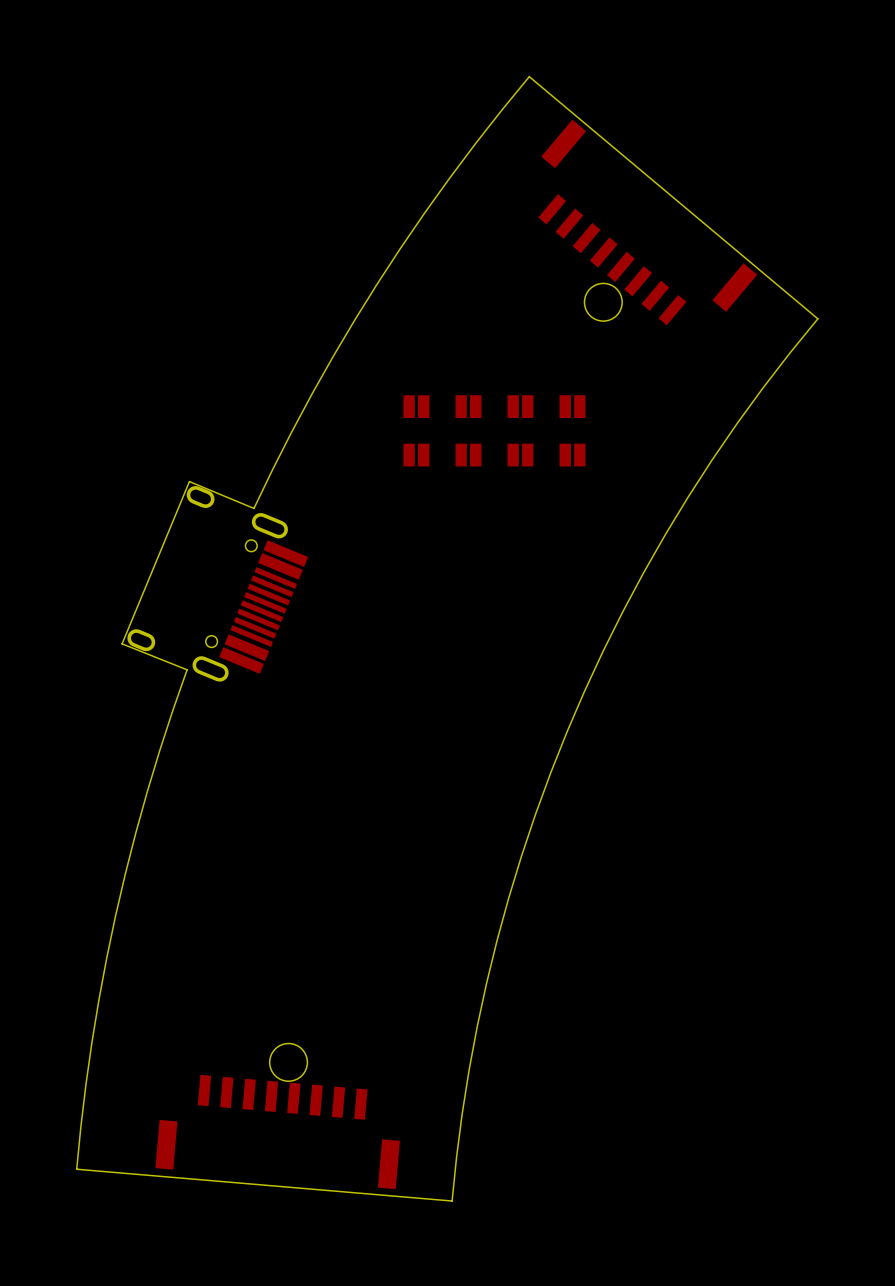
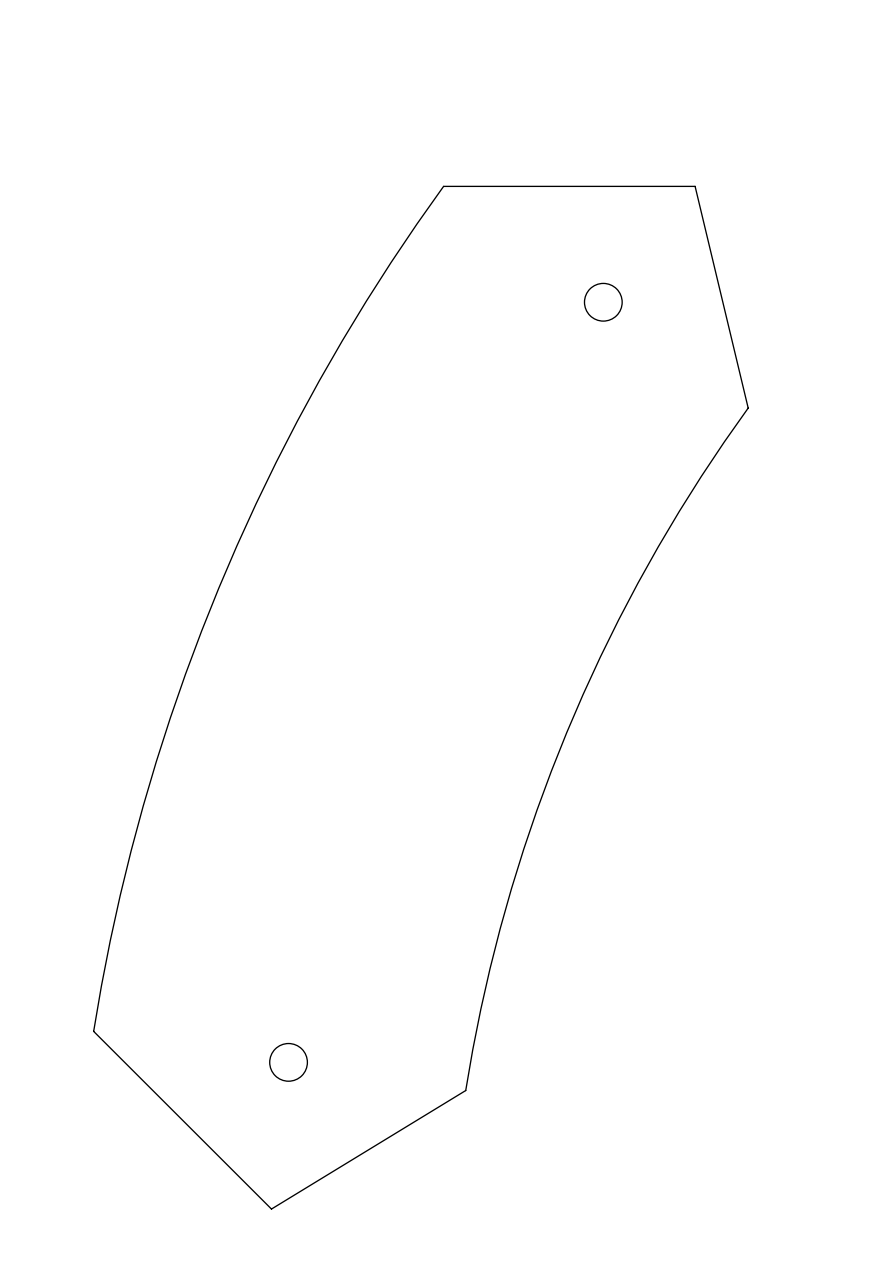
board edge: (529, 76) (817, 318) (737, 423) (665, 534) (603, 651) (567, 731) (535, 814) (497, 940) (469, 1069) (452, 1201) (76, 1169) (92, 1041) (115, 915) (147, 791) (187, 669) (122, 643) (189, 481) (253, 508) (312, 393) (377, 283) (450, 177) (529, 76) -> (695, 186) (748, 408) (701, 476) (658, 547) (618, 619) (566, 732) (523, 849) (500, 928) (480, 1009) (465, 1090) (271, 1209) (93, 1031) (110, 940) (143, 806) (170, 717) (218, 588) (276, 462) (319, 380) (366, 301) (443, 186) (695, 186)
part: (647, 222) -> none
part: (416, 406) -> none
part: (468, 406) -> none
part: (520, 406) -> none
part: (572, 406) -> none
part: (416, 455) -> none
part: (468, 455) -> none
part: (520, 455) -> none
part: (572, 455) -> none
part: (217, 583) -> none
part: (277, 1131) -> none

